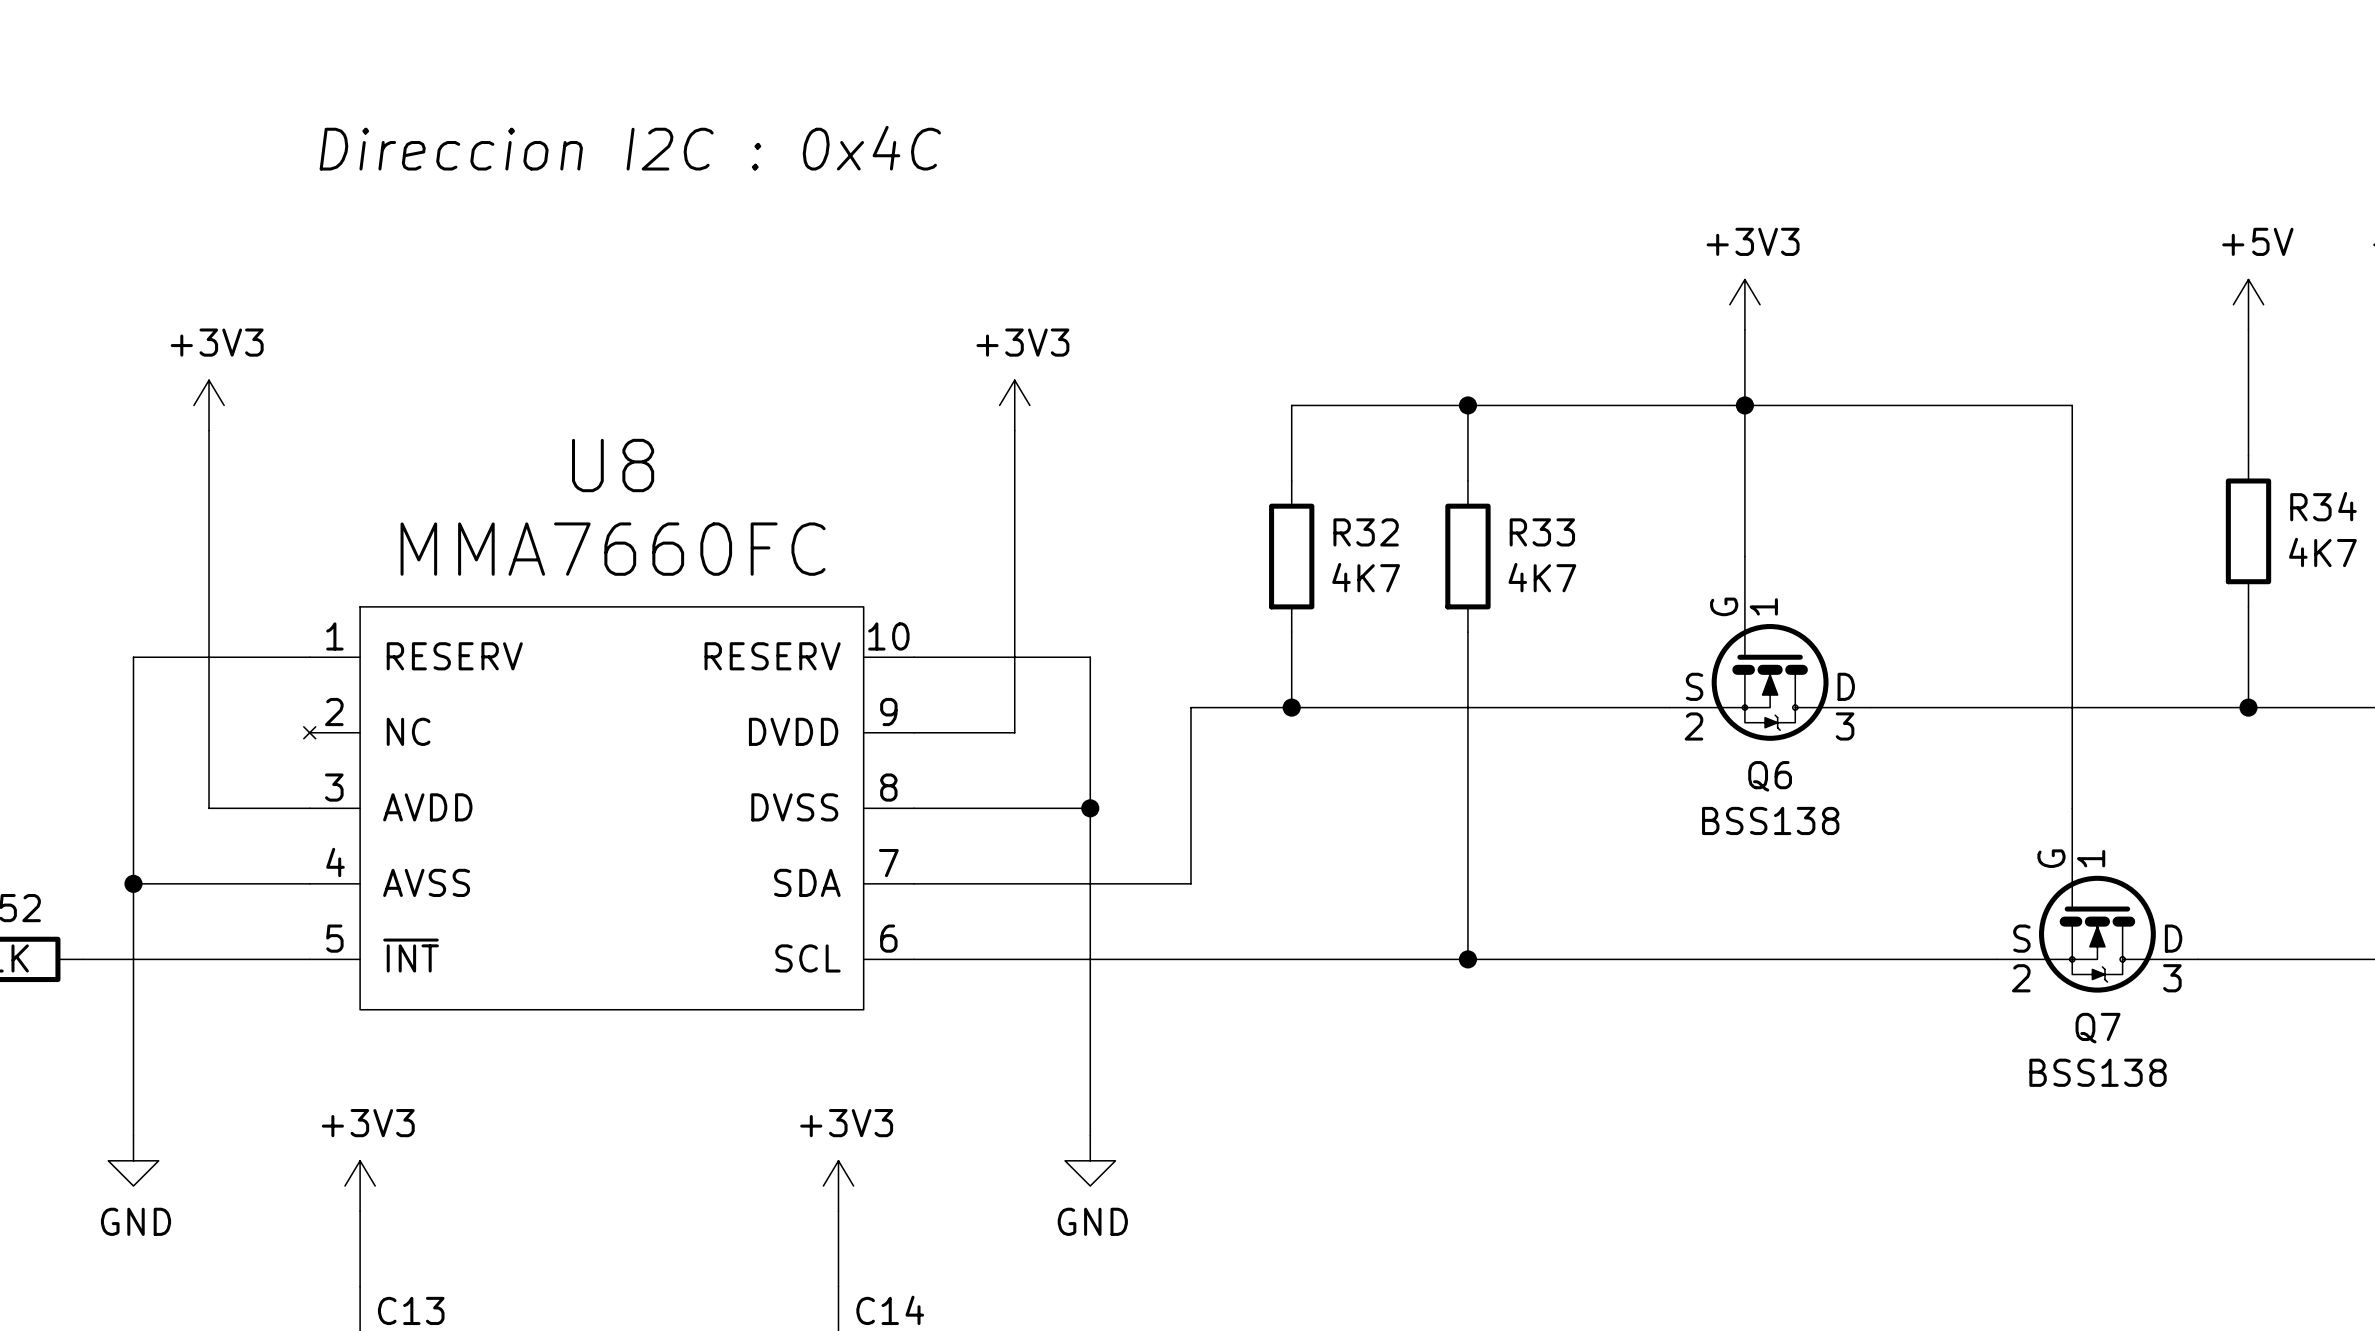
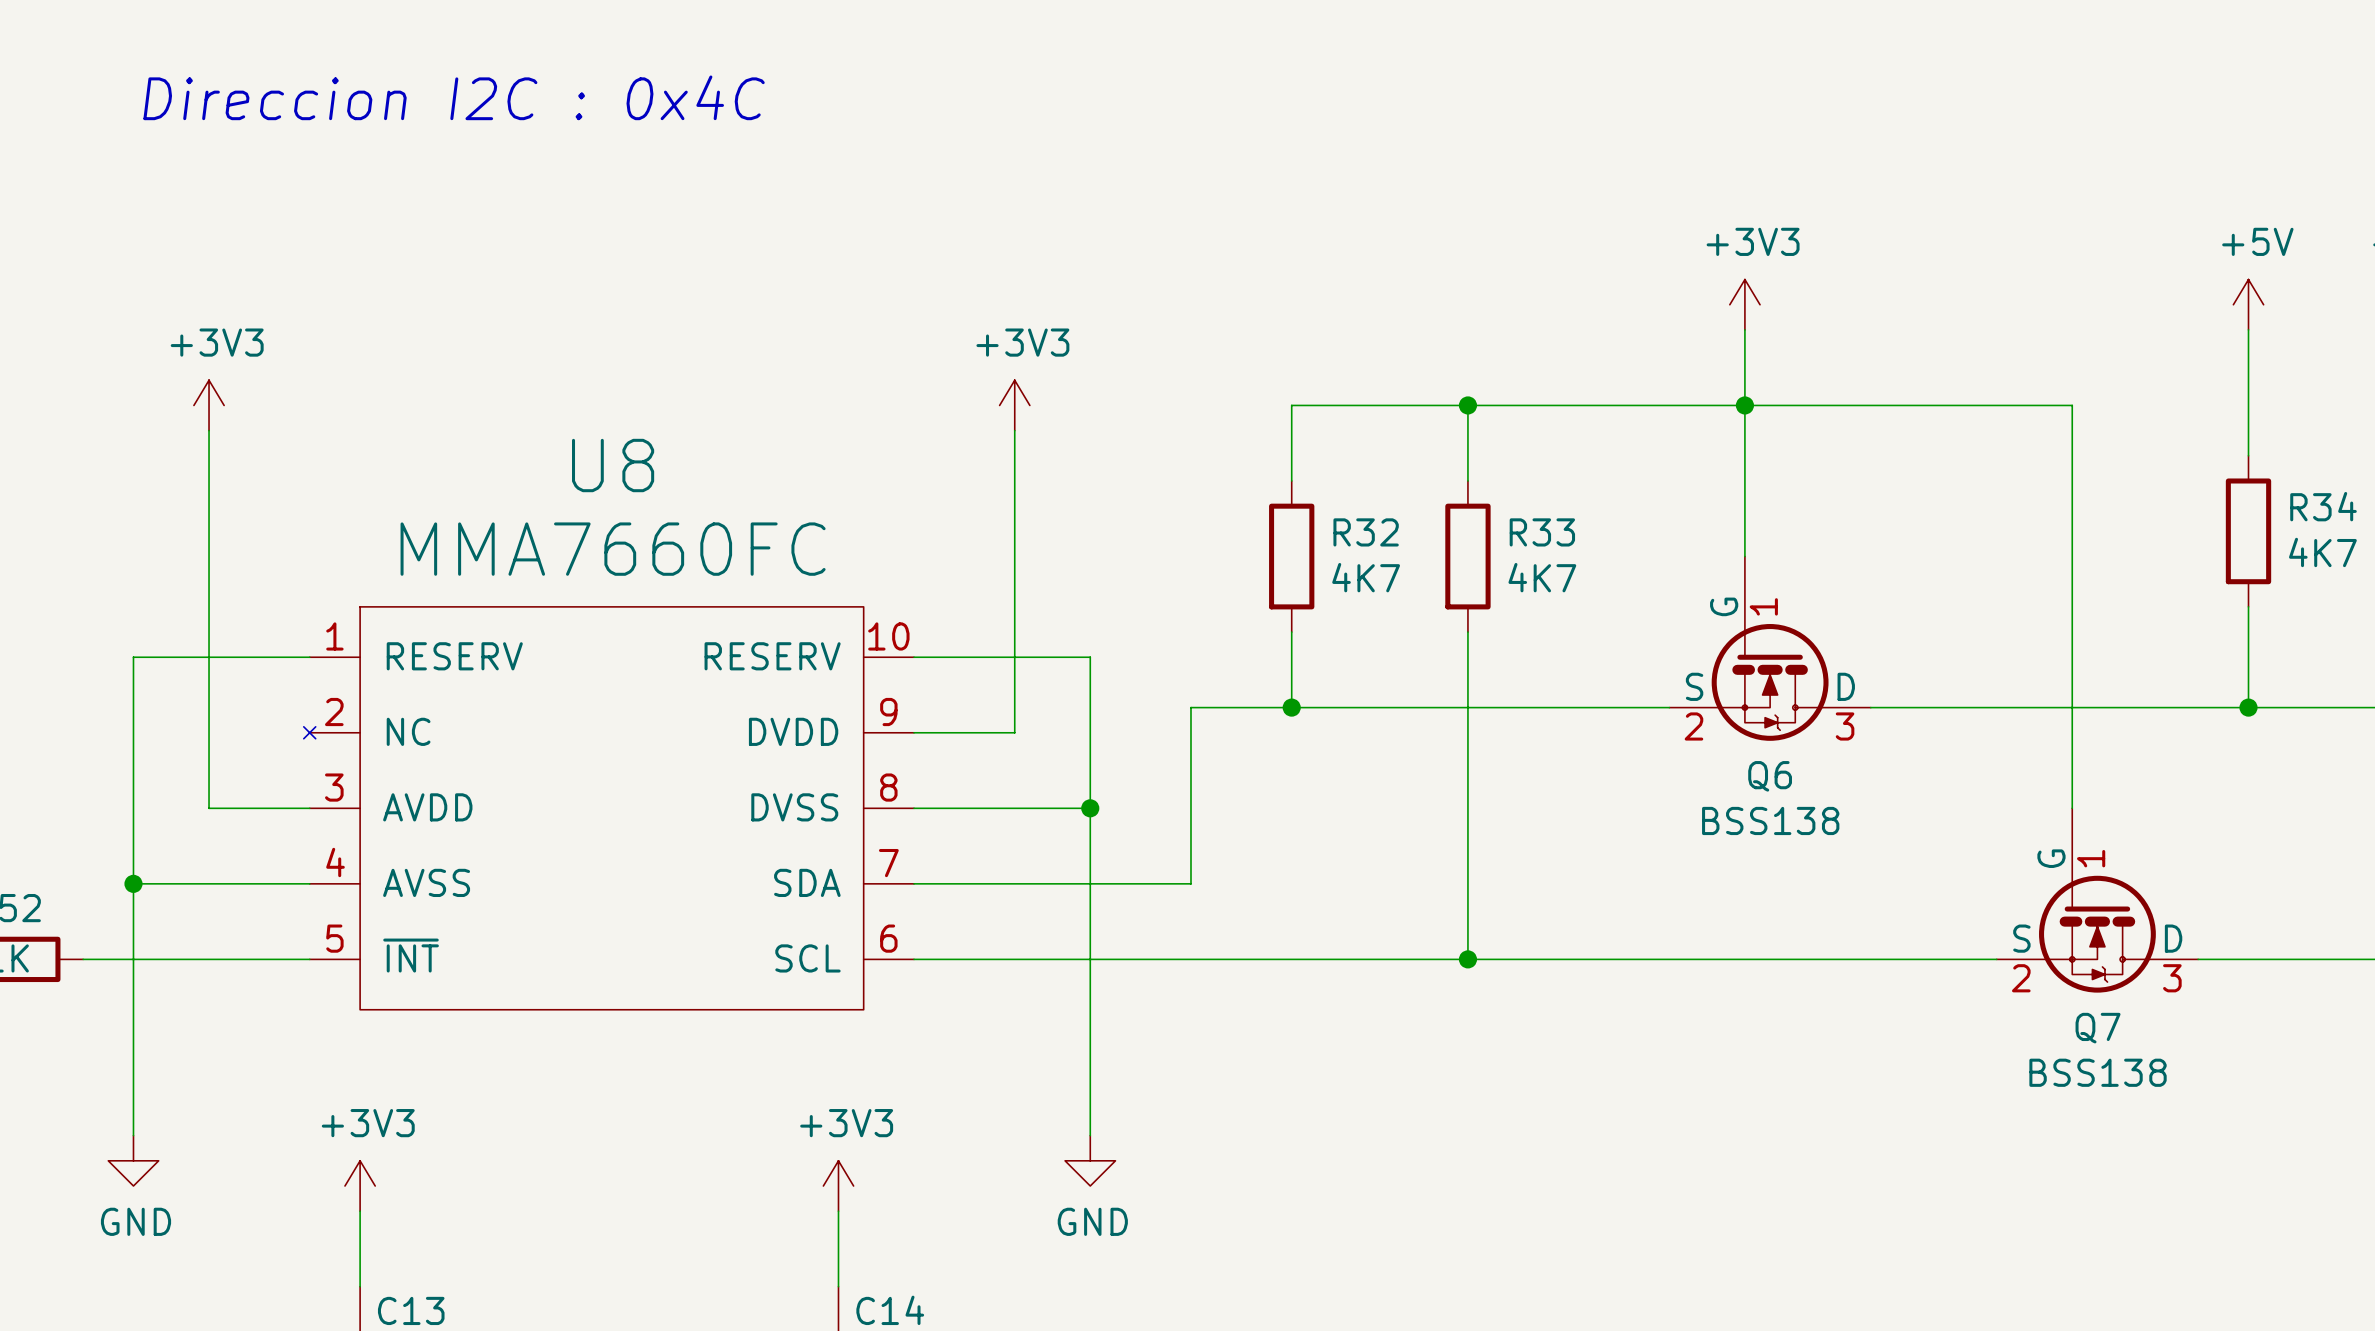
text position: Direccion I2C : 0x4C (630, 148) -> Direccion I2C : 0x4C (454, 97)

